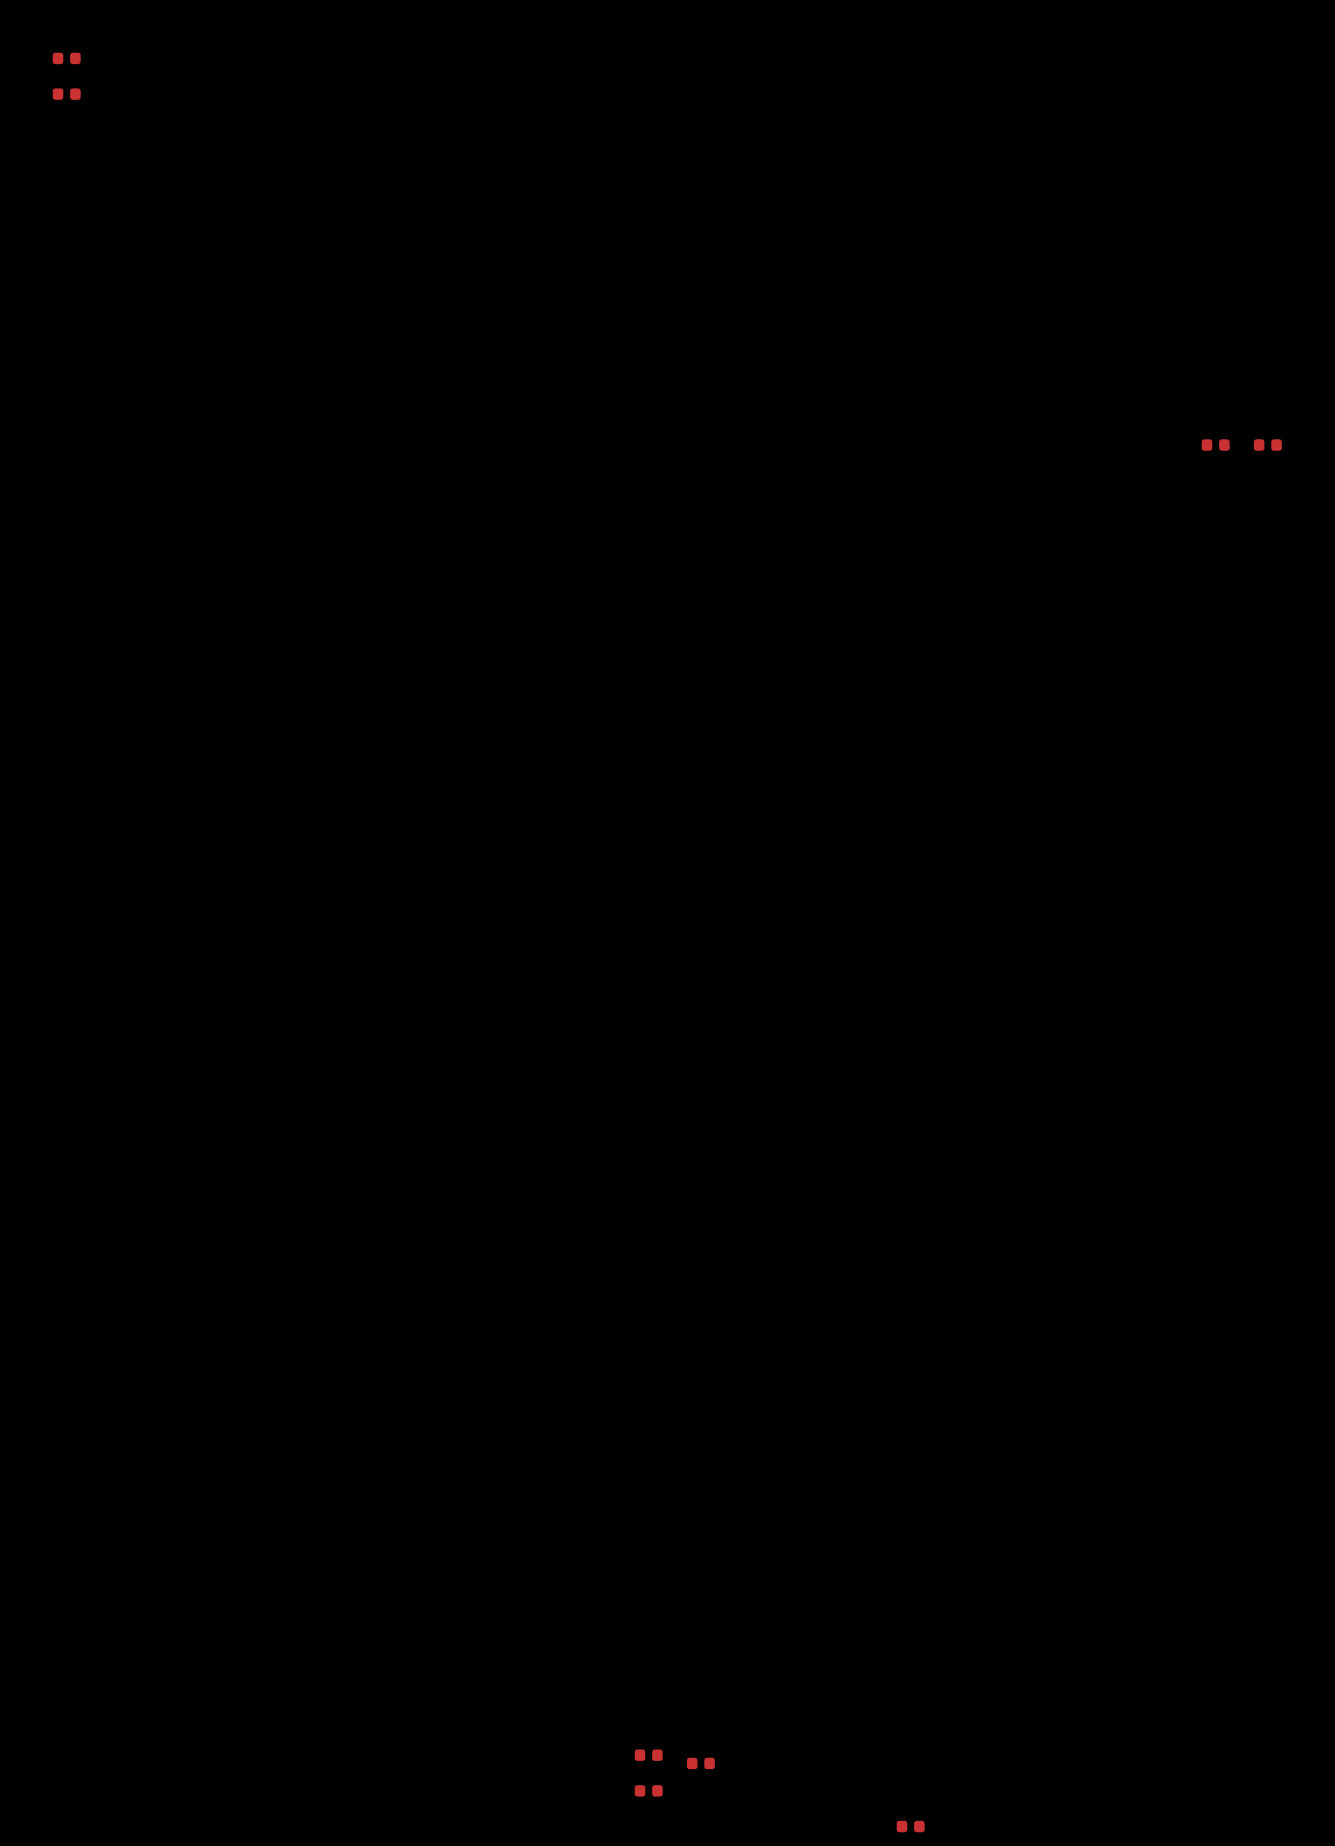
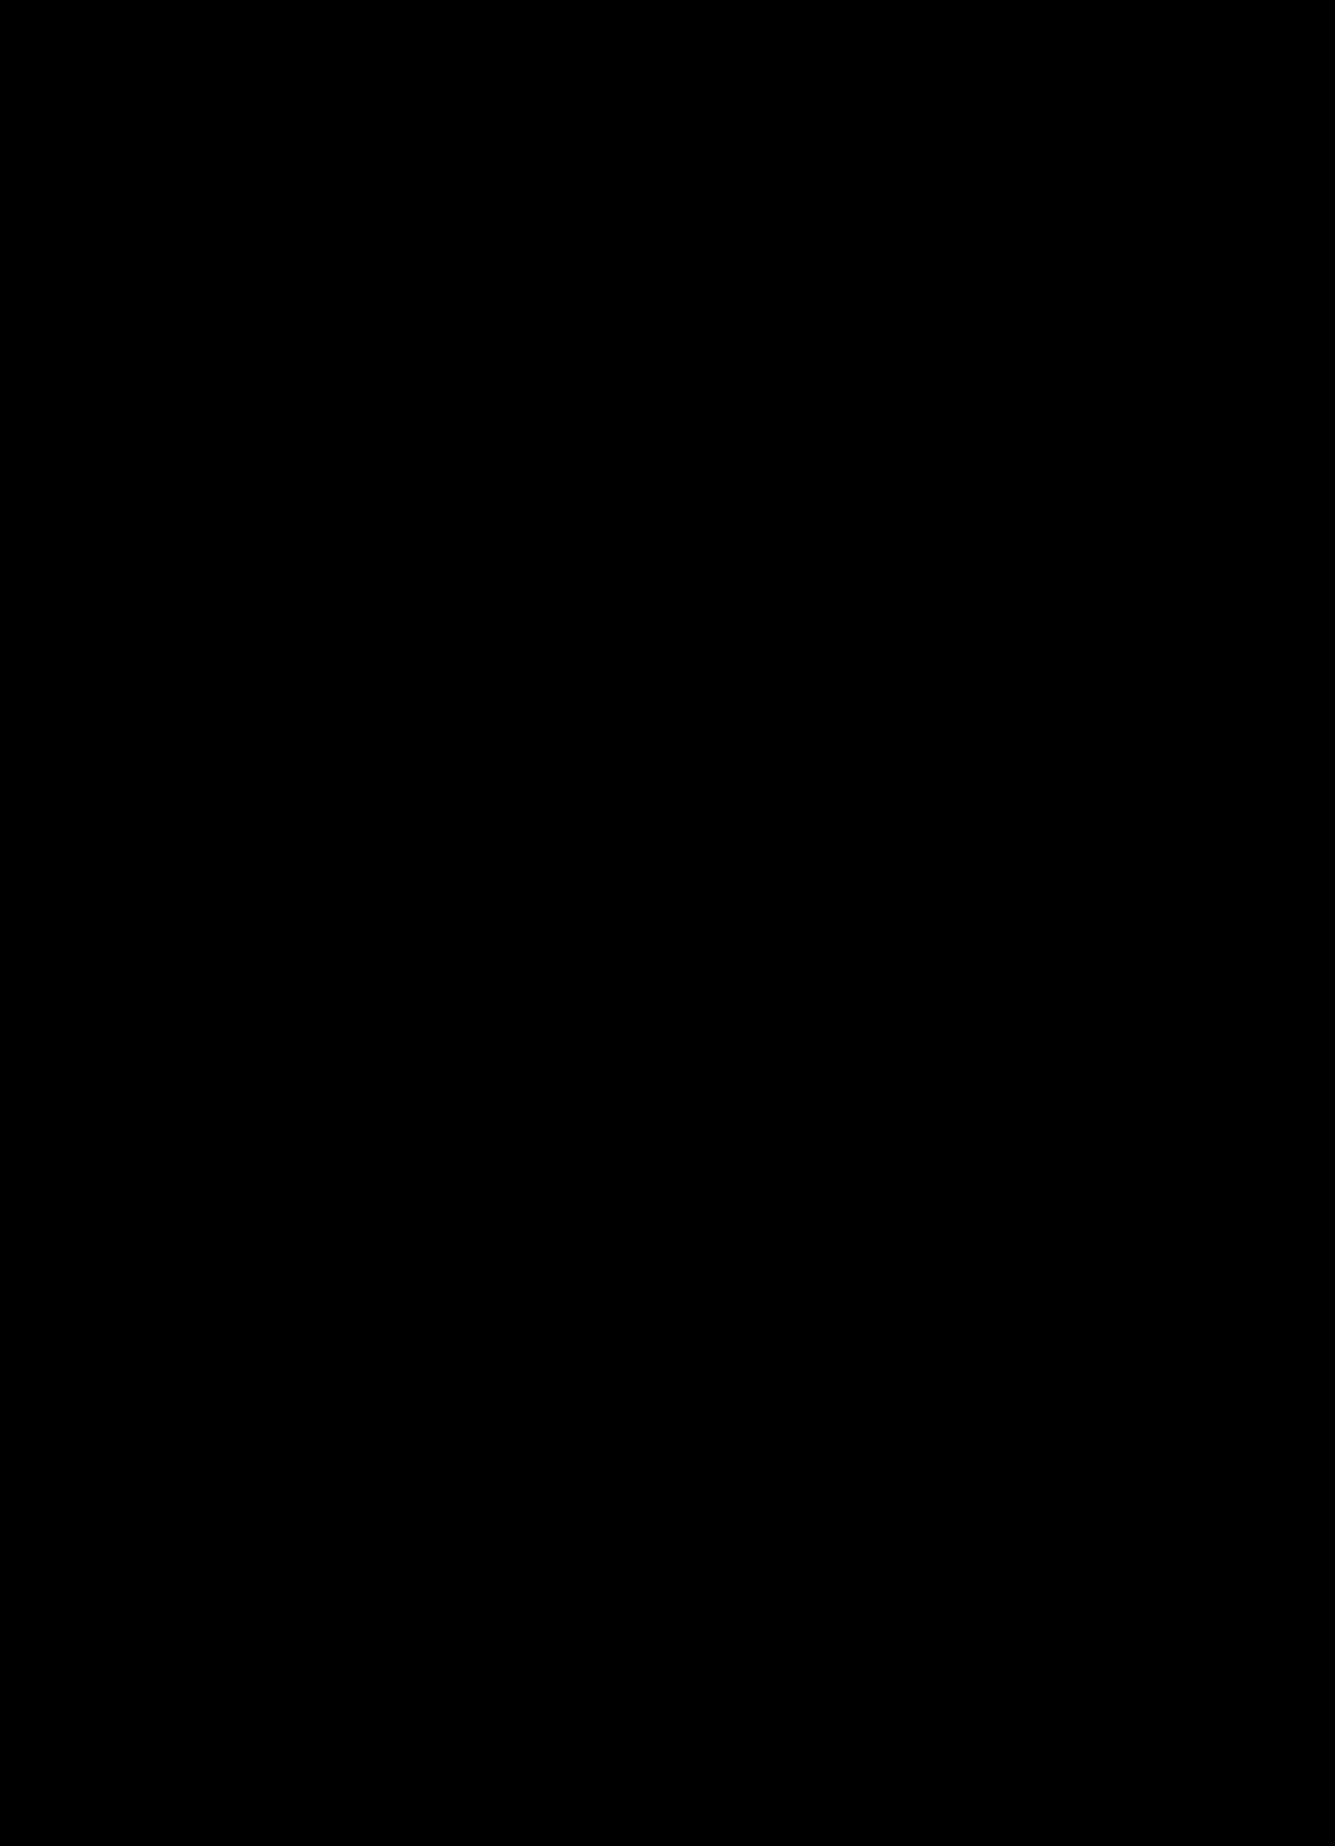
part: (66, 58) -> none
part: (66, 94) -> none
part: (1215, 445) -> none
part: (1267, 445) -> none
part: (648, 1755) -> none
part: (700, 1763) -> none
part: (648, 1790) -> none
part: (910, 1826) -> none

